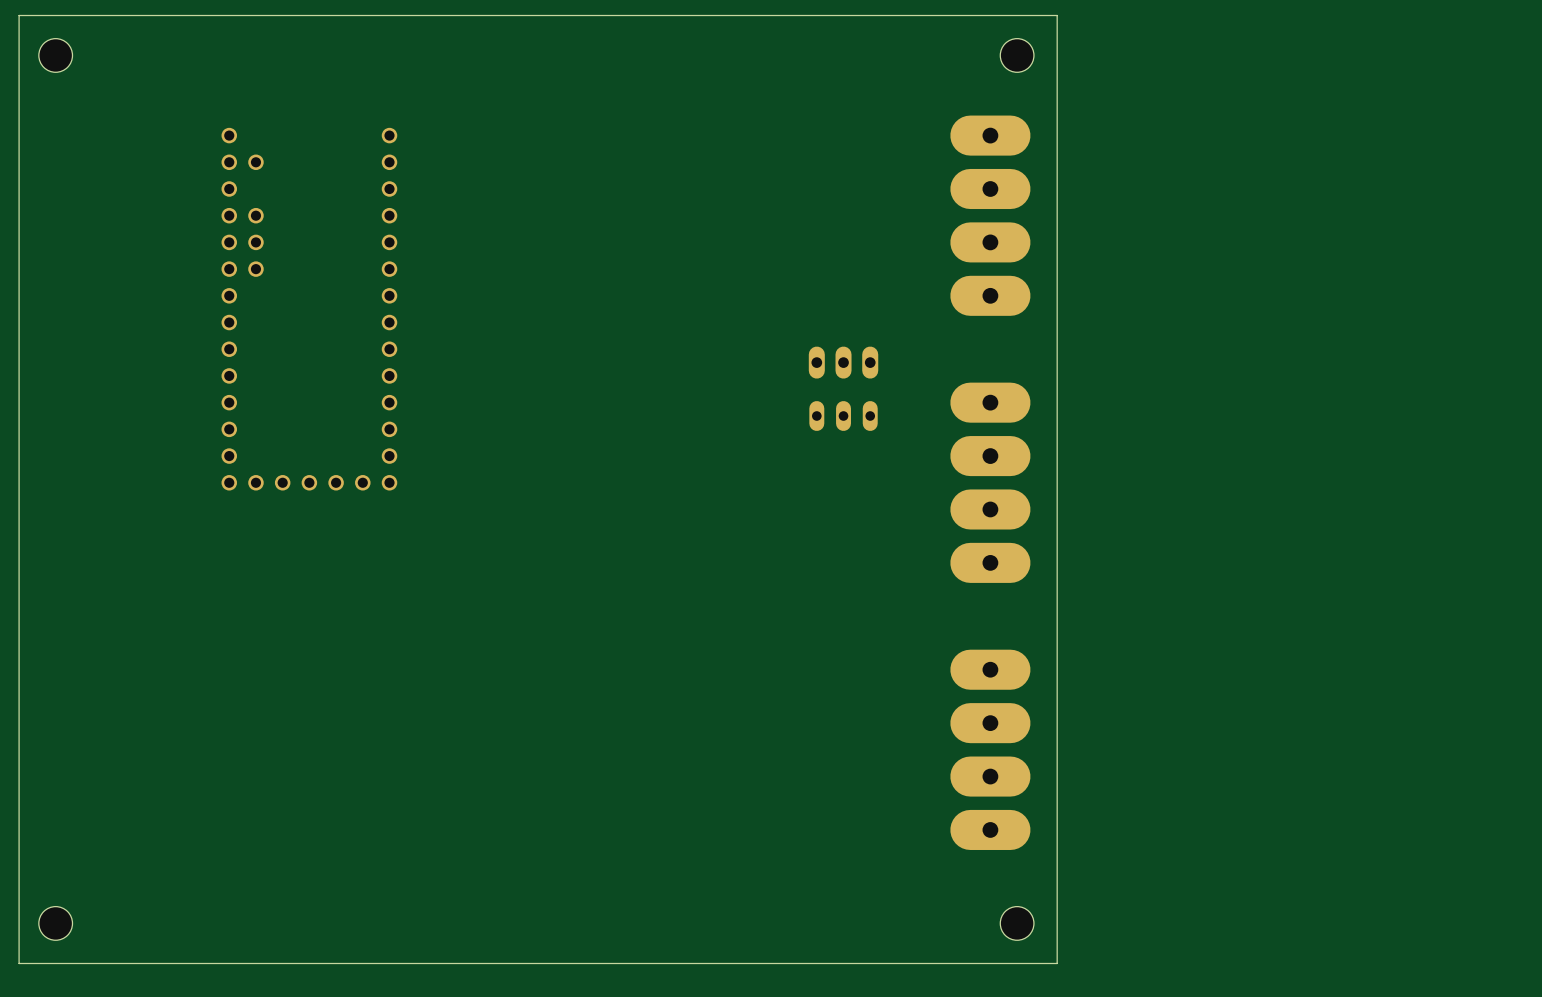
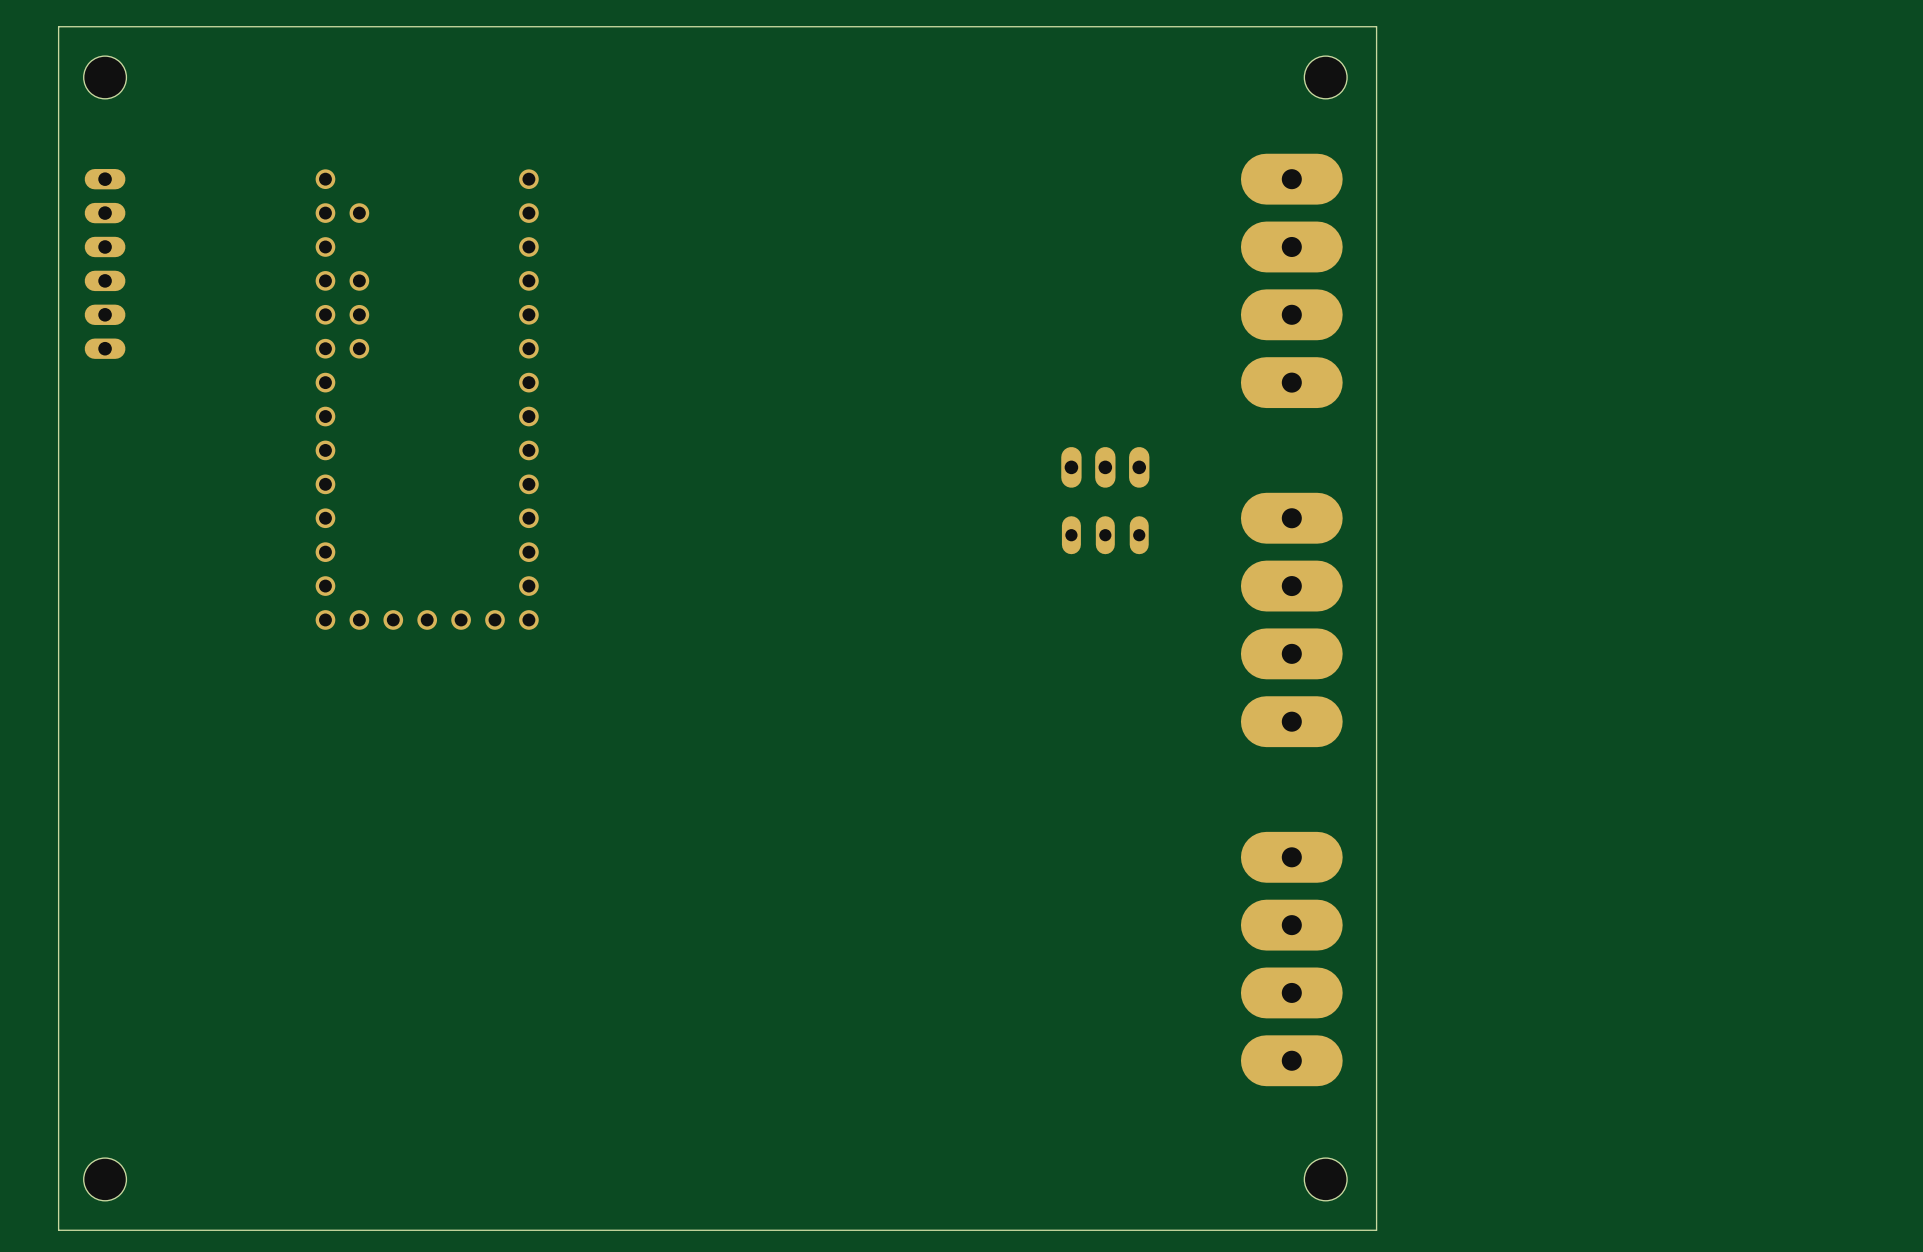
part: none -> (105, 263)

